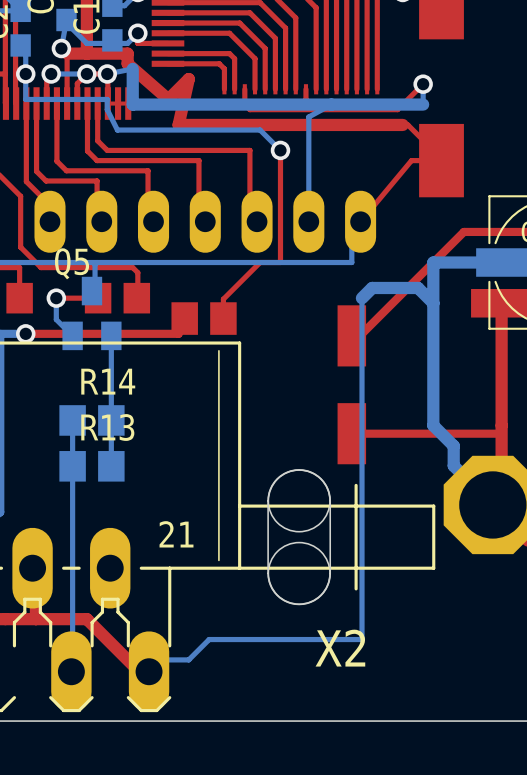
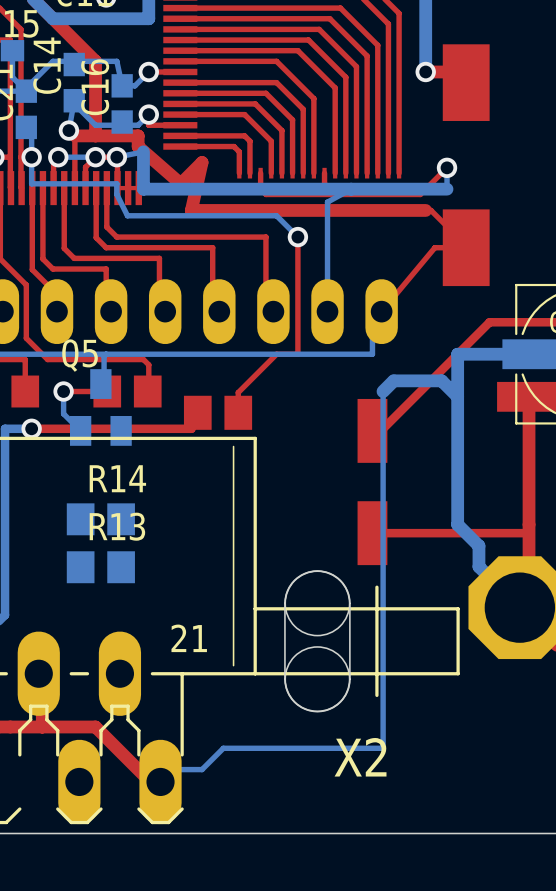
bottom track: (111, 335) (111, 466) -> none
bottom track: (72, 420) (71, 671) -> none

